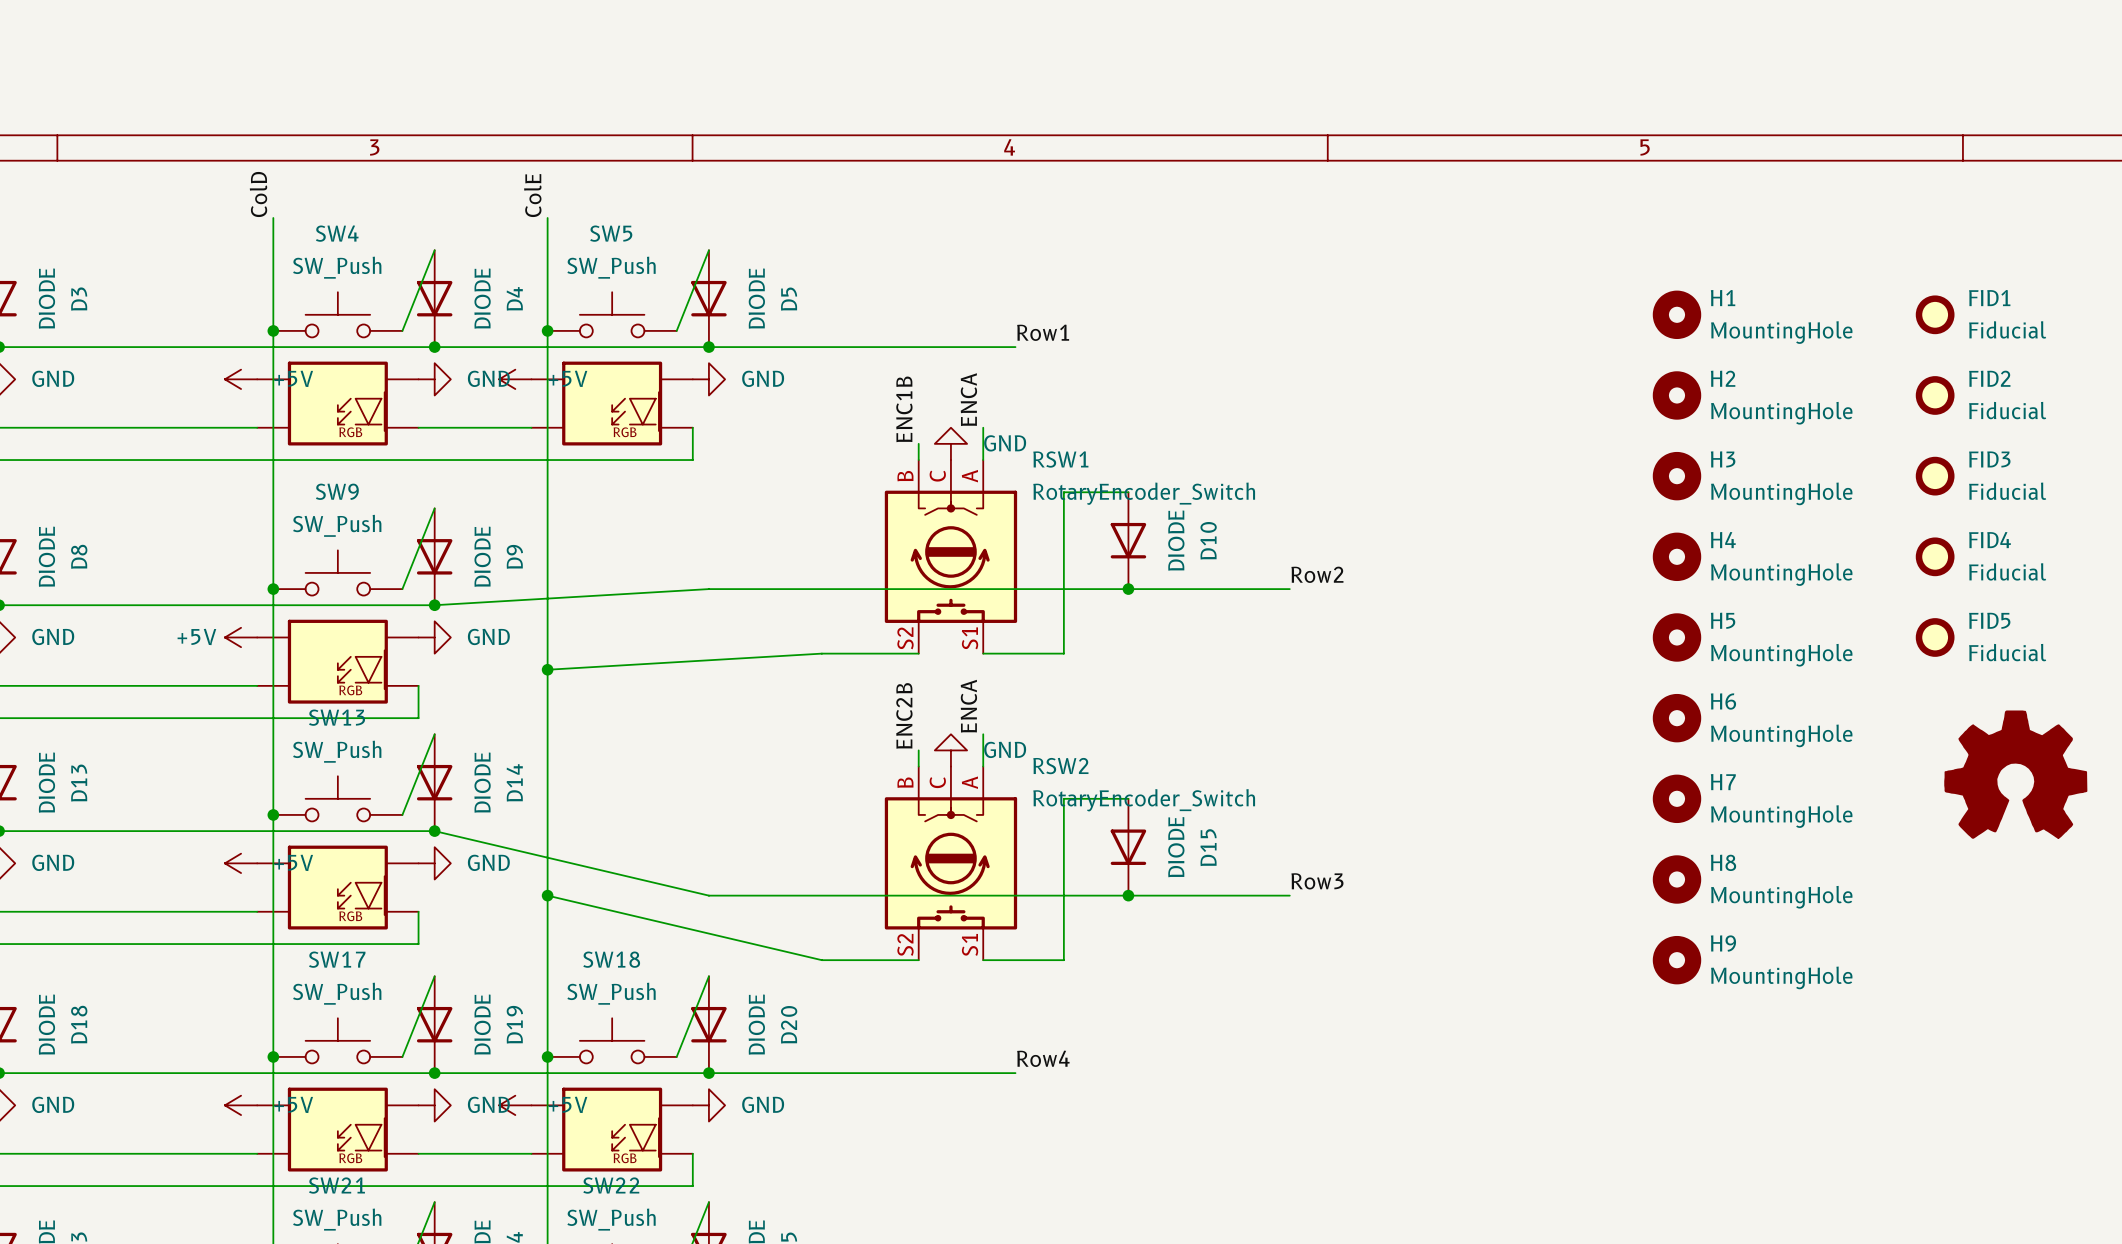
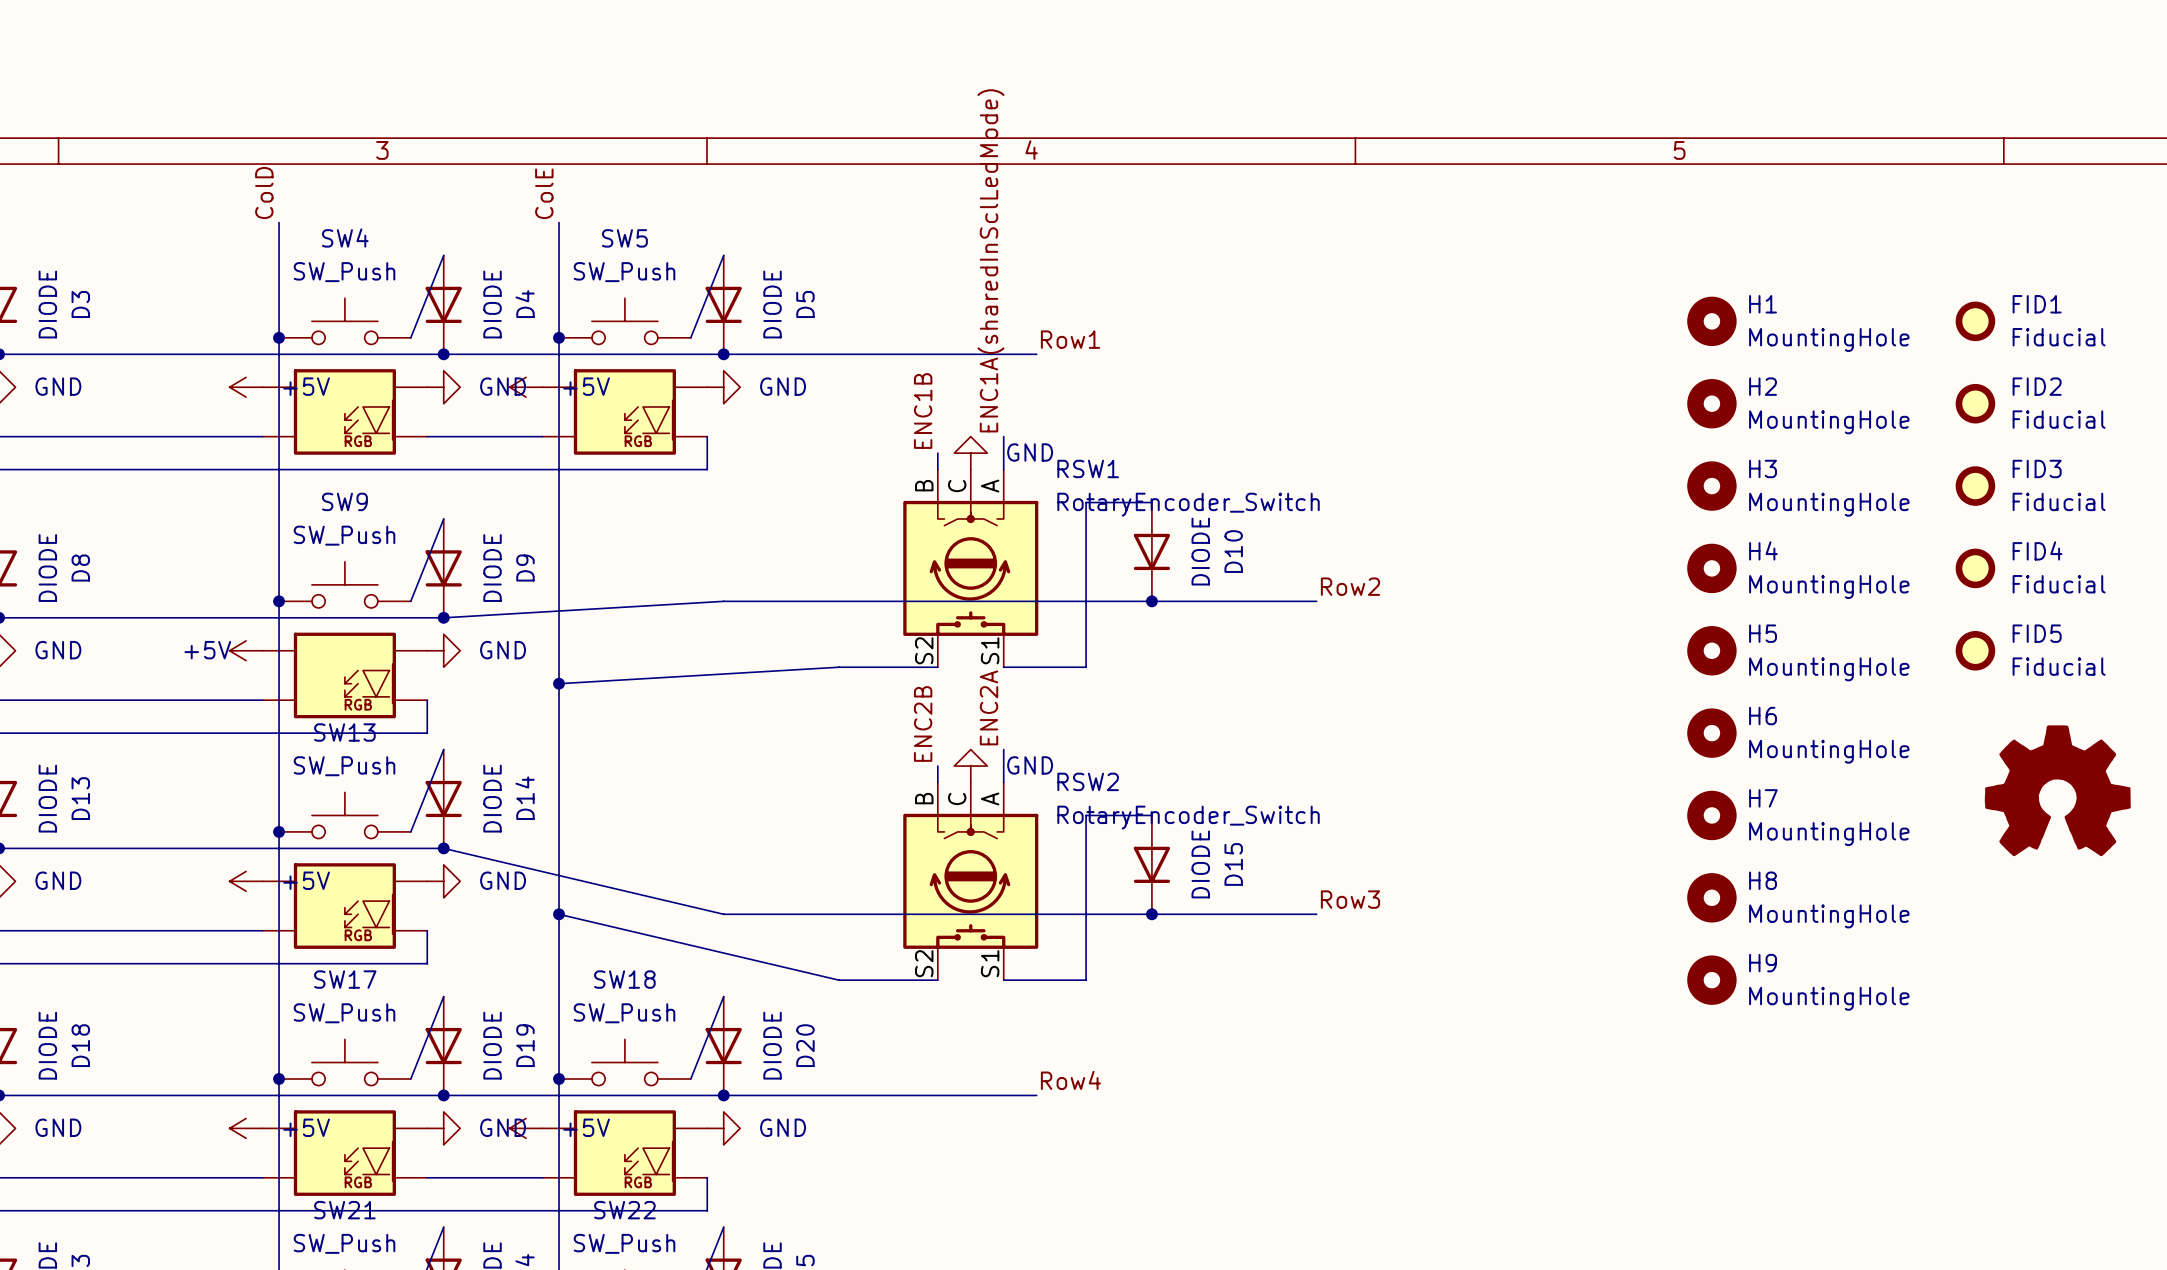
label: ENCA (968, 399) -> ENC1A(sharedInSclLedMode) (990, 260)
label: ENCA (968, 706) -> ENC2A (989, 707)

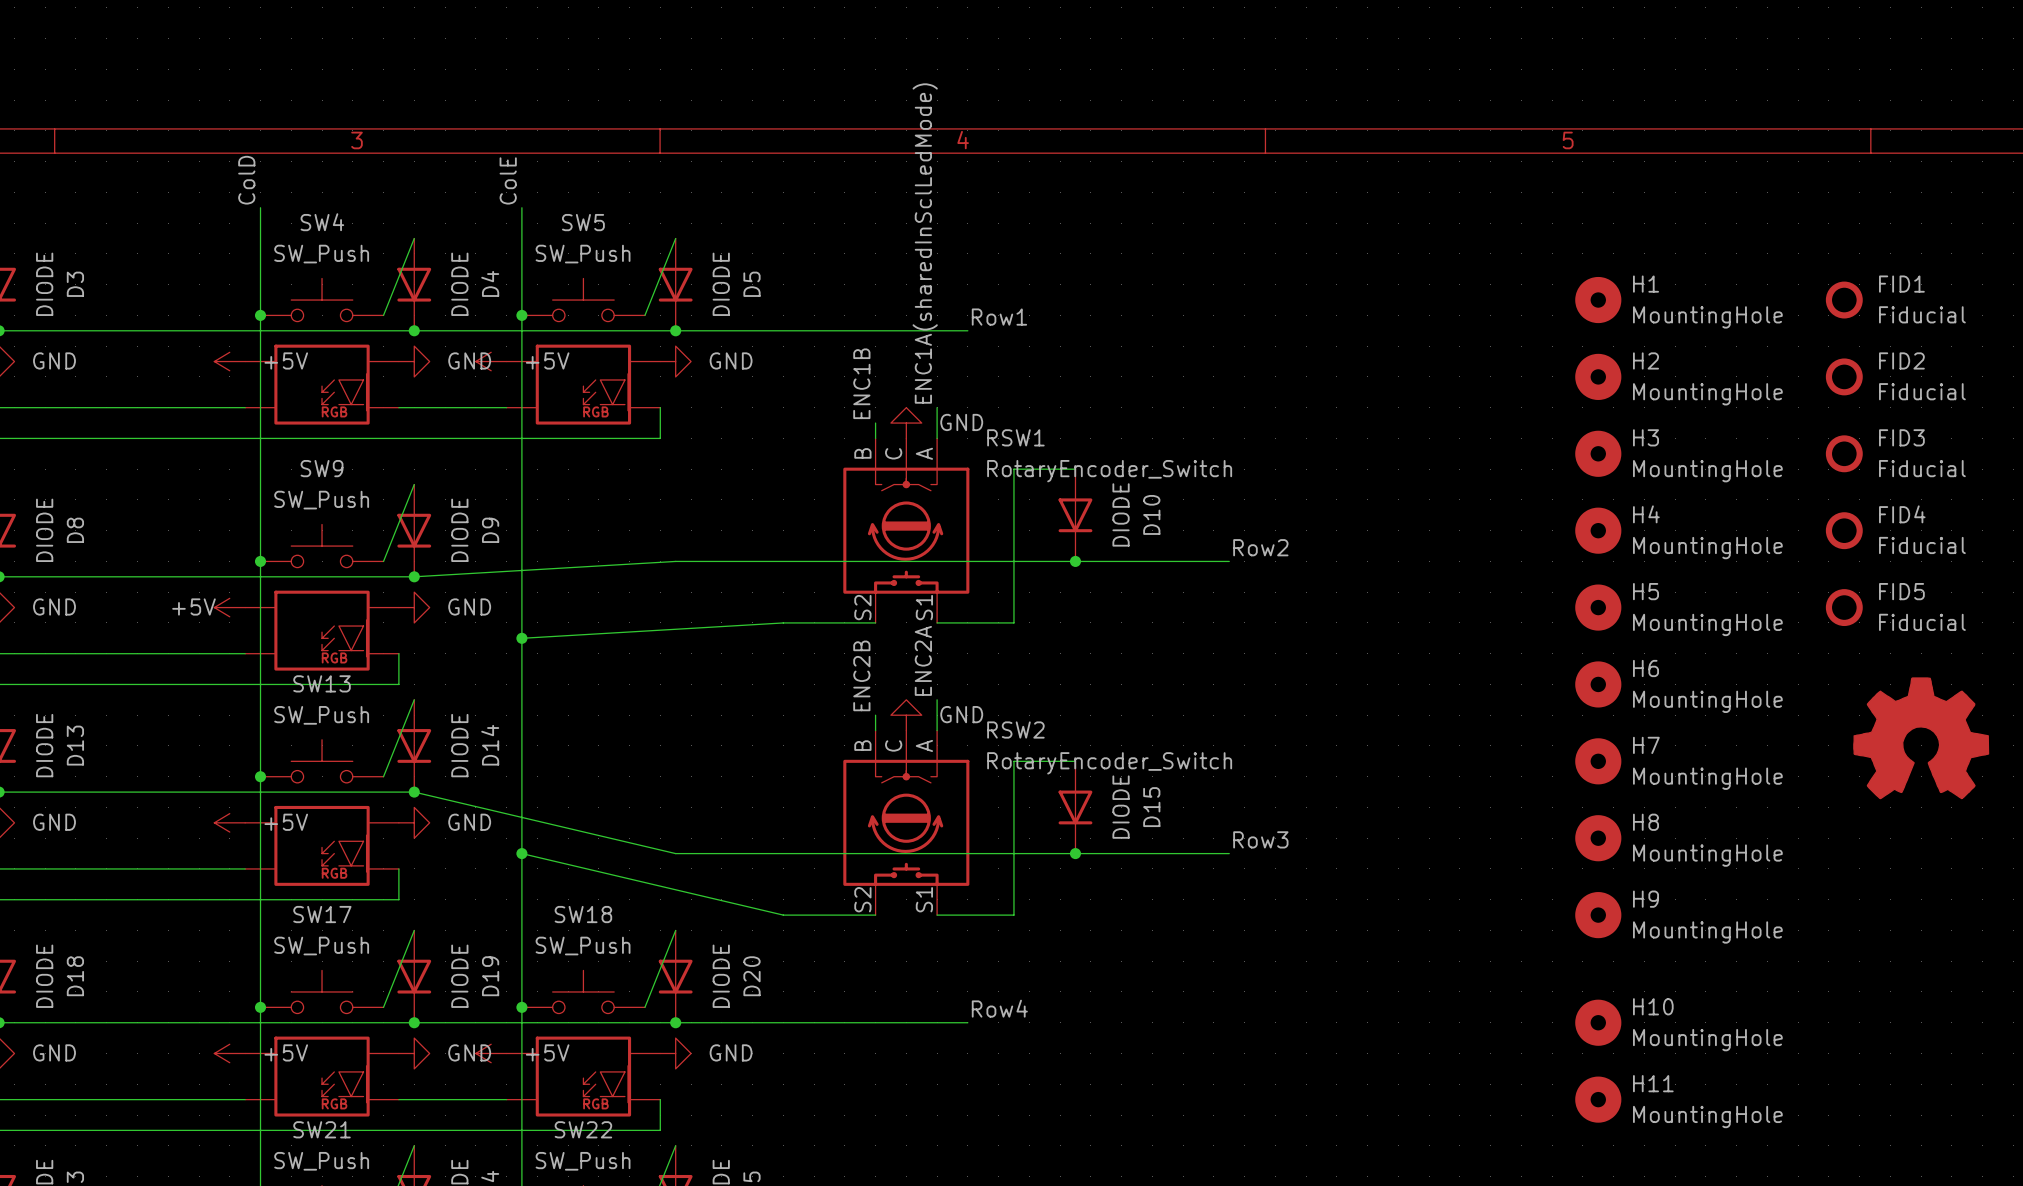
H10: none -> MountingHole (1598, 1022)
H11: none -> MountingHole (1598, 1099)

